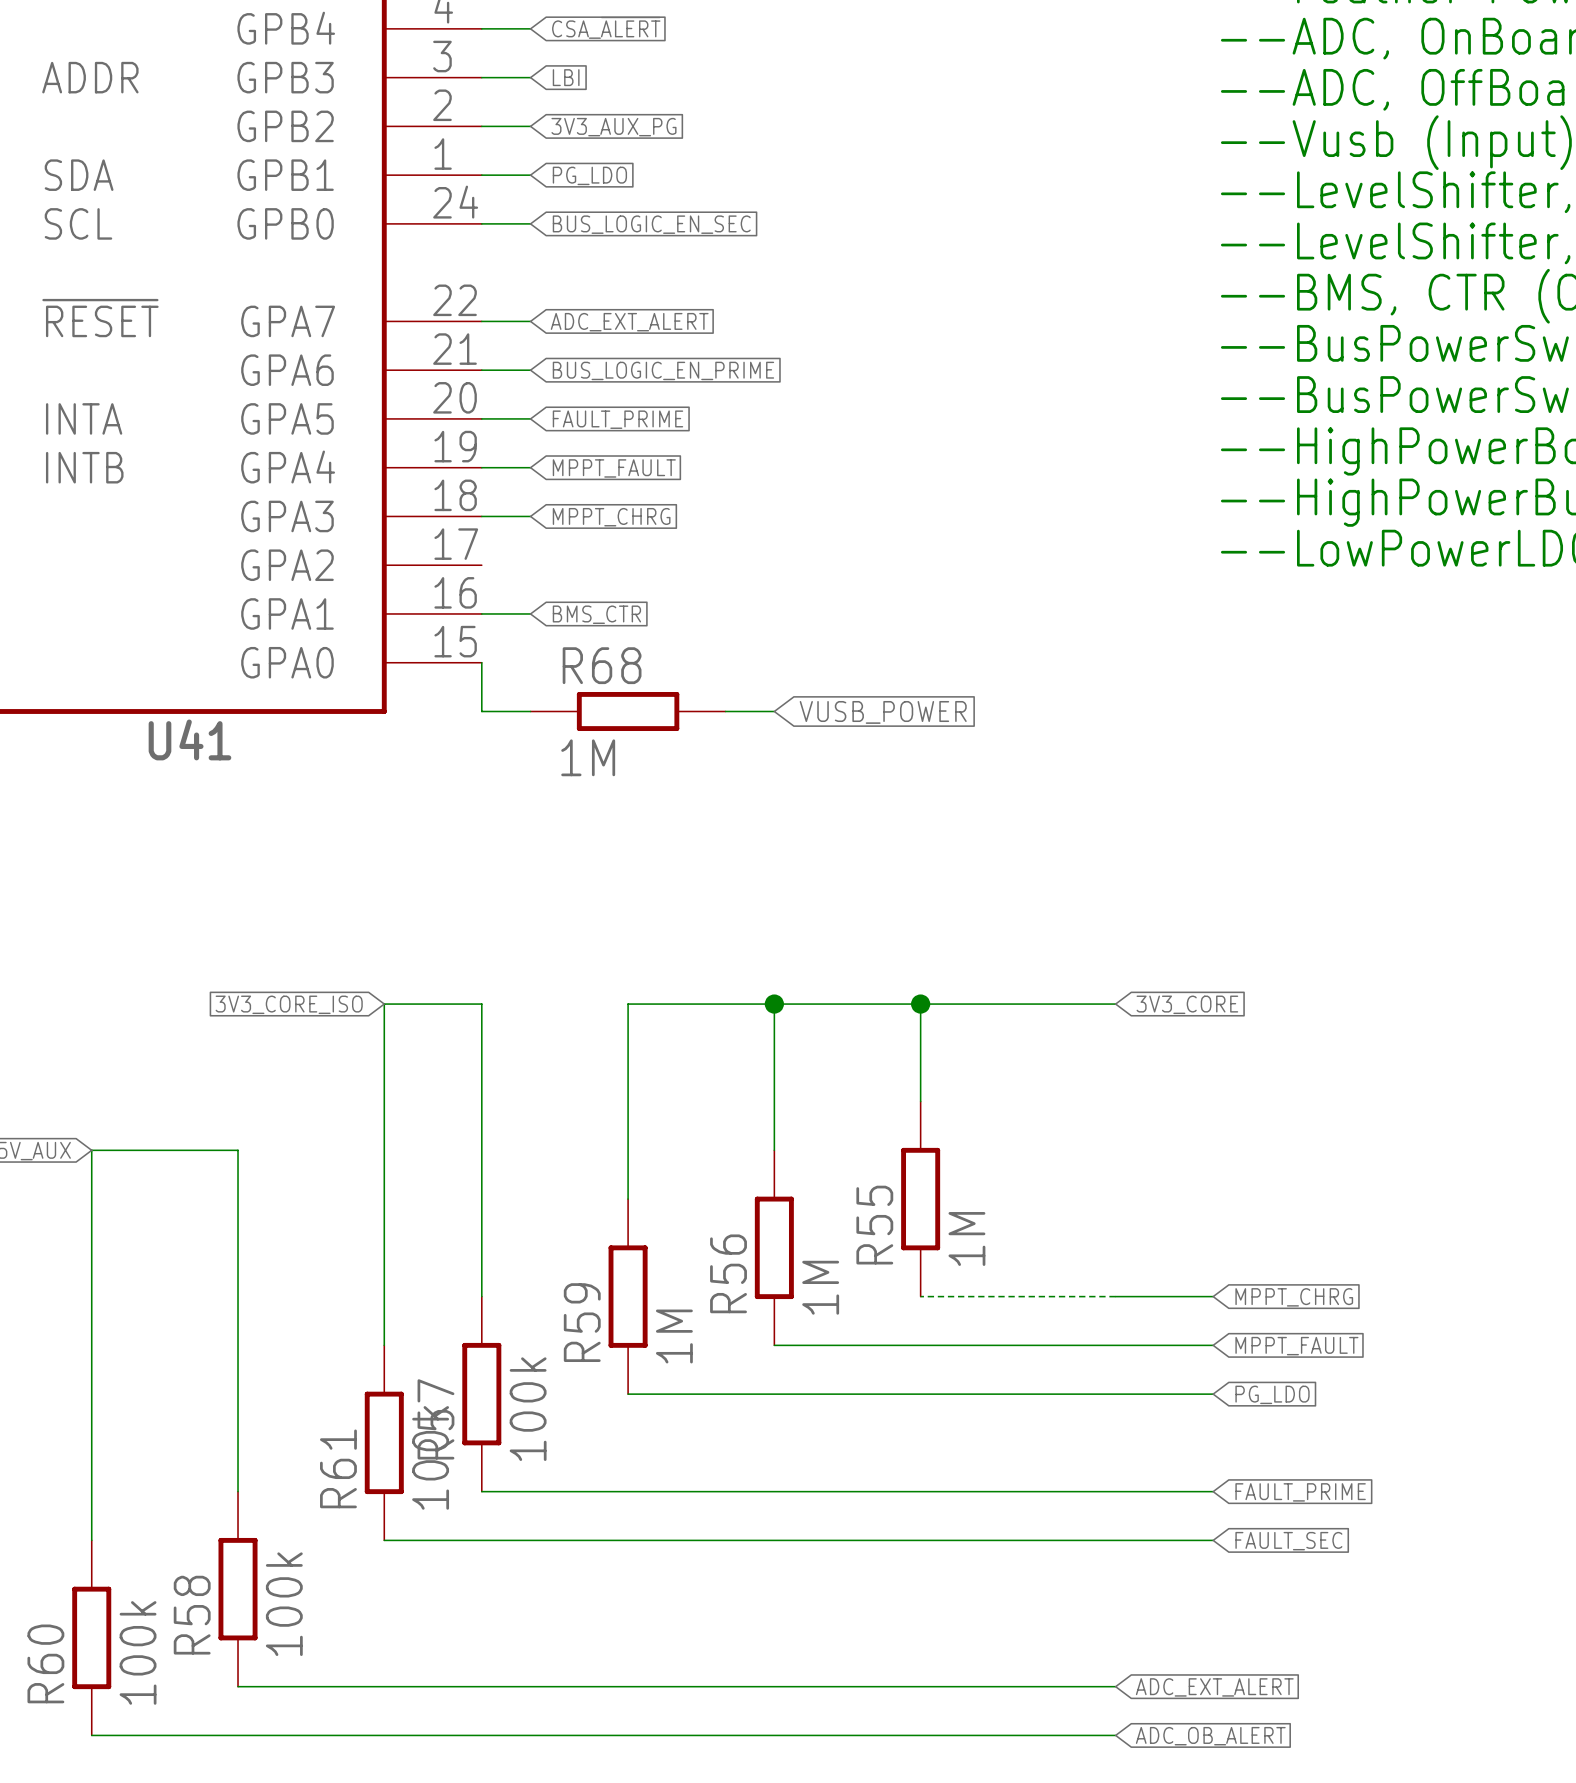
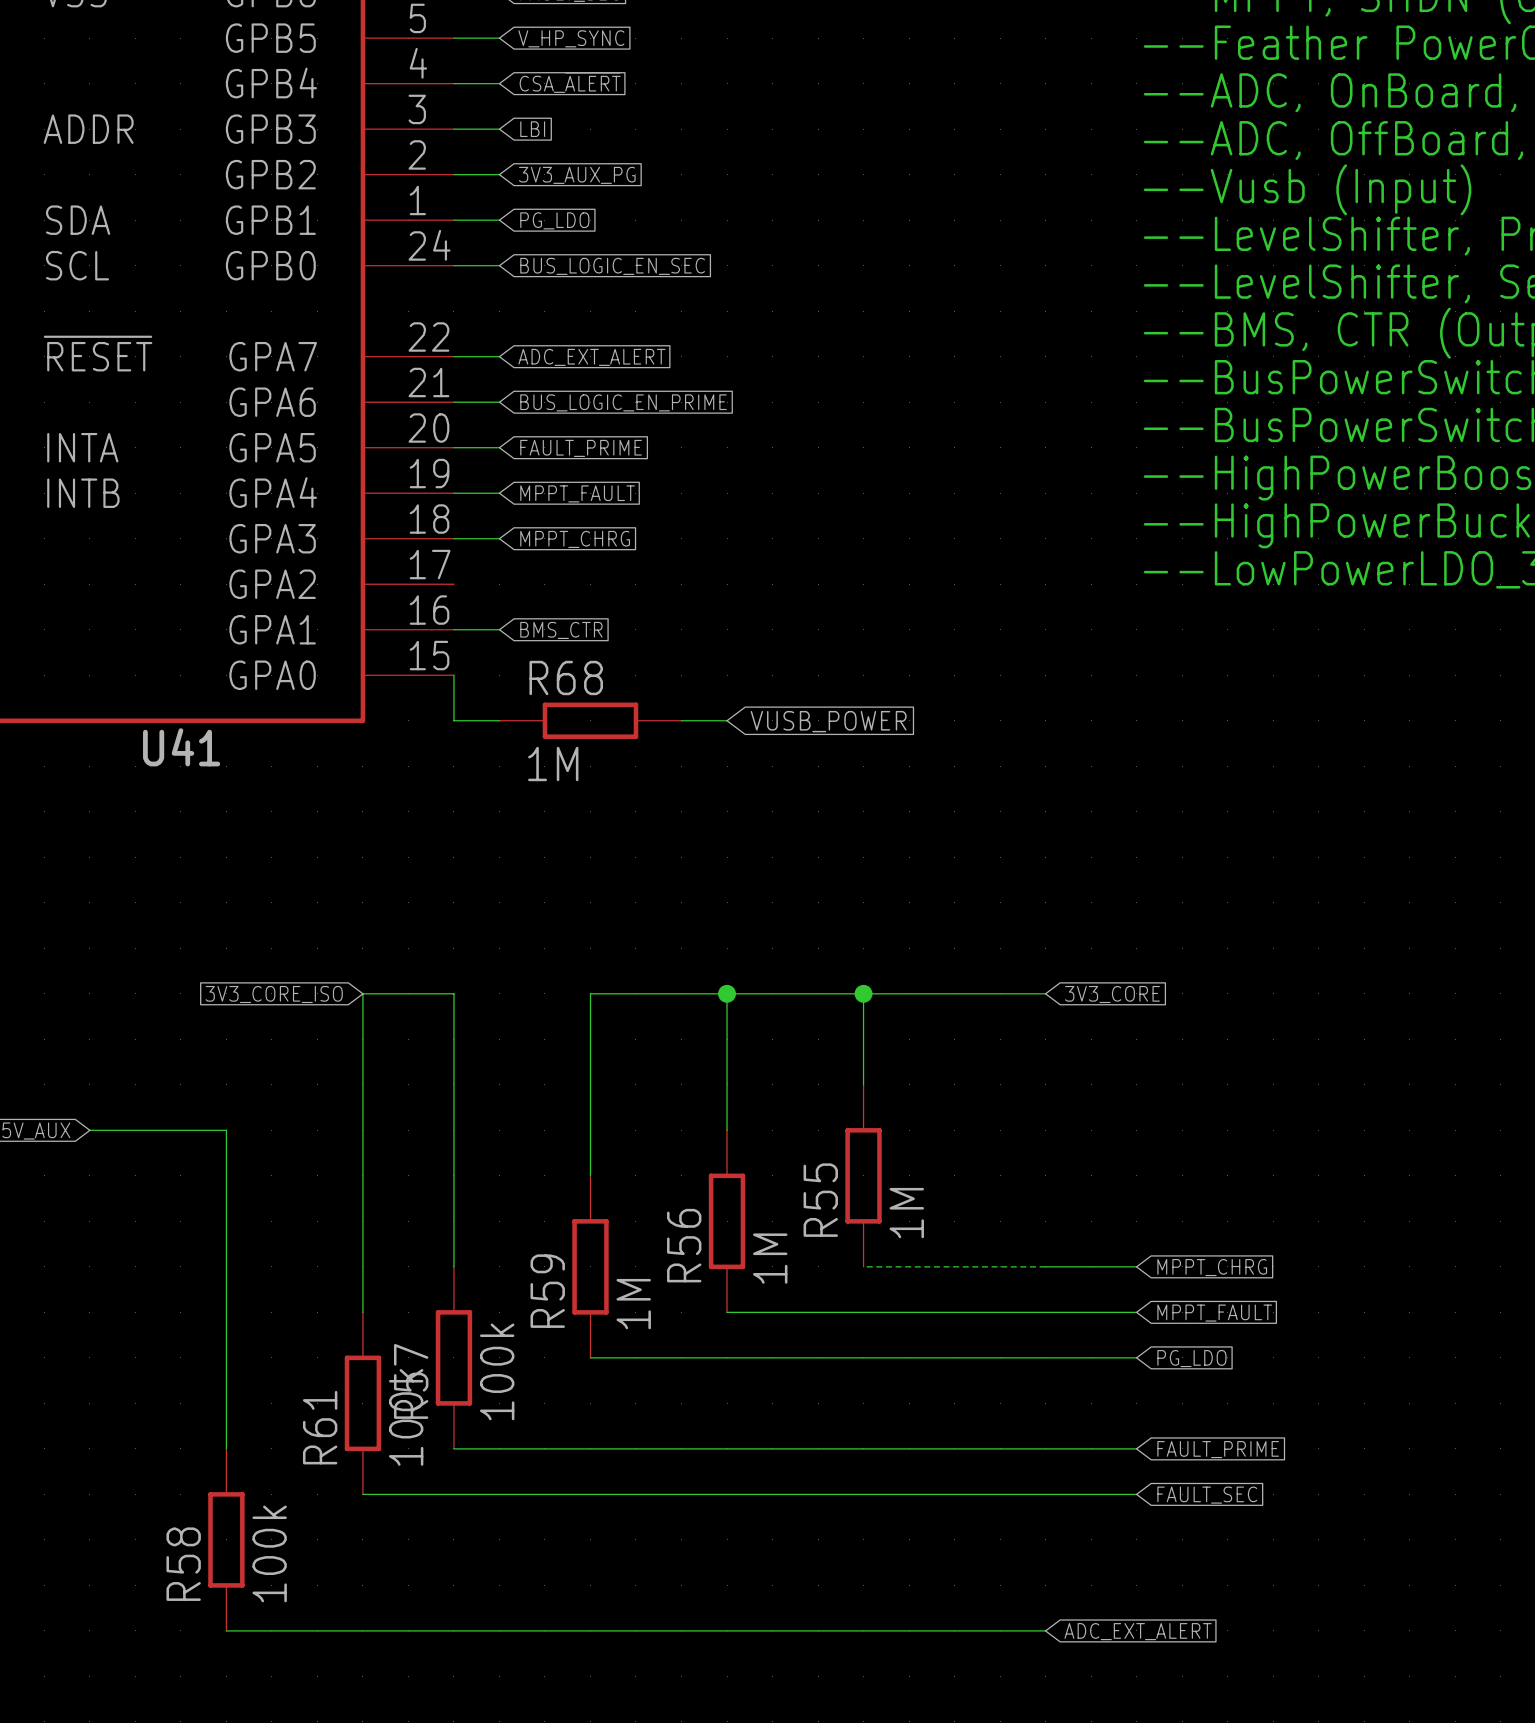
wire: (91, 1150) (91, 1540) -> none
R60: 100k (91, 1637) -> none
wire: (91, 1735) (1115, 1735) -> none
global label: ADC_OB_ALERT (1210, 1736) -> none

